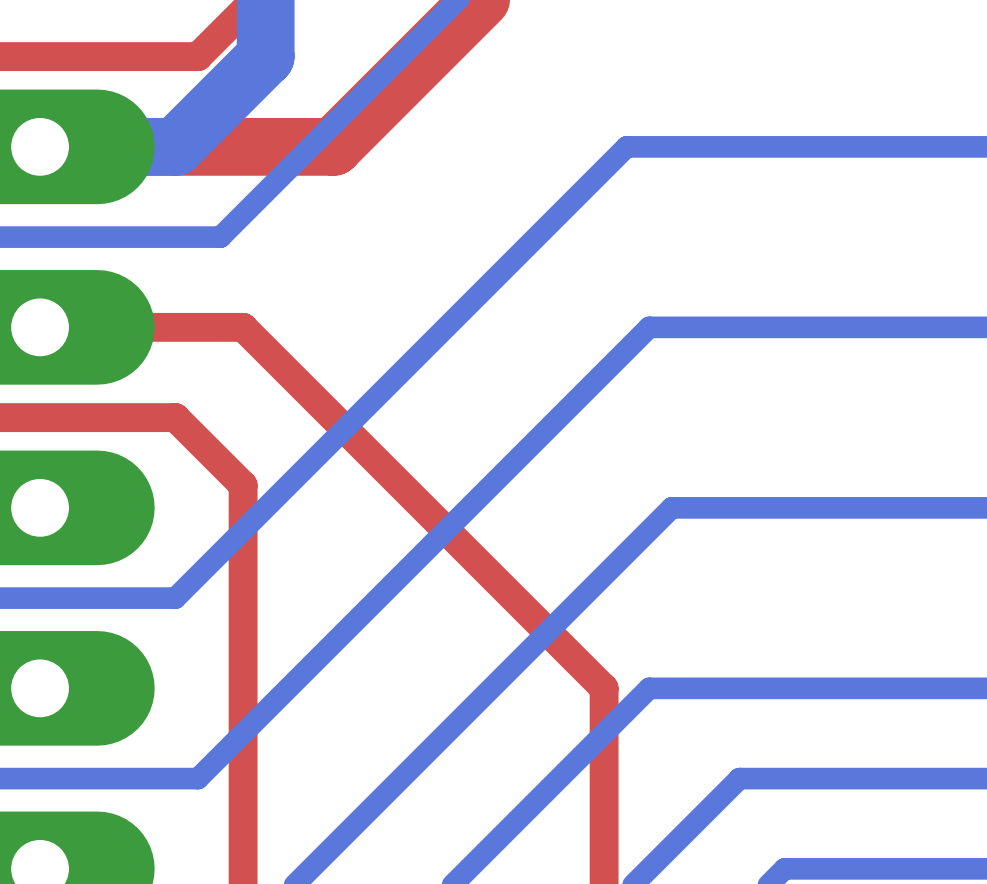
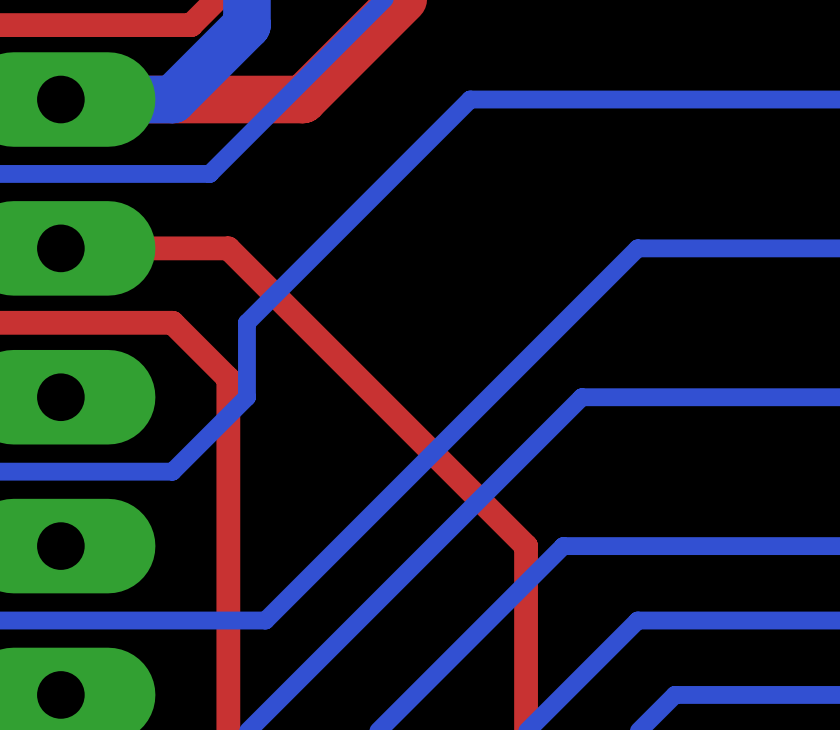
bottom track: (626, 146) (265, 507) -> (544, 99) (470, 99) (246, 322) (246, 397)
bottom track: (739, 327) (649, 327) (197, 778) -> (637, 248) (265, 620) (191, 620)

